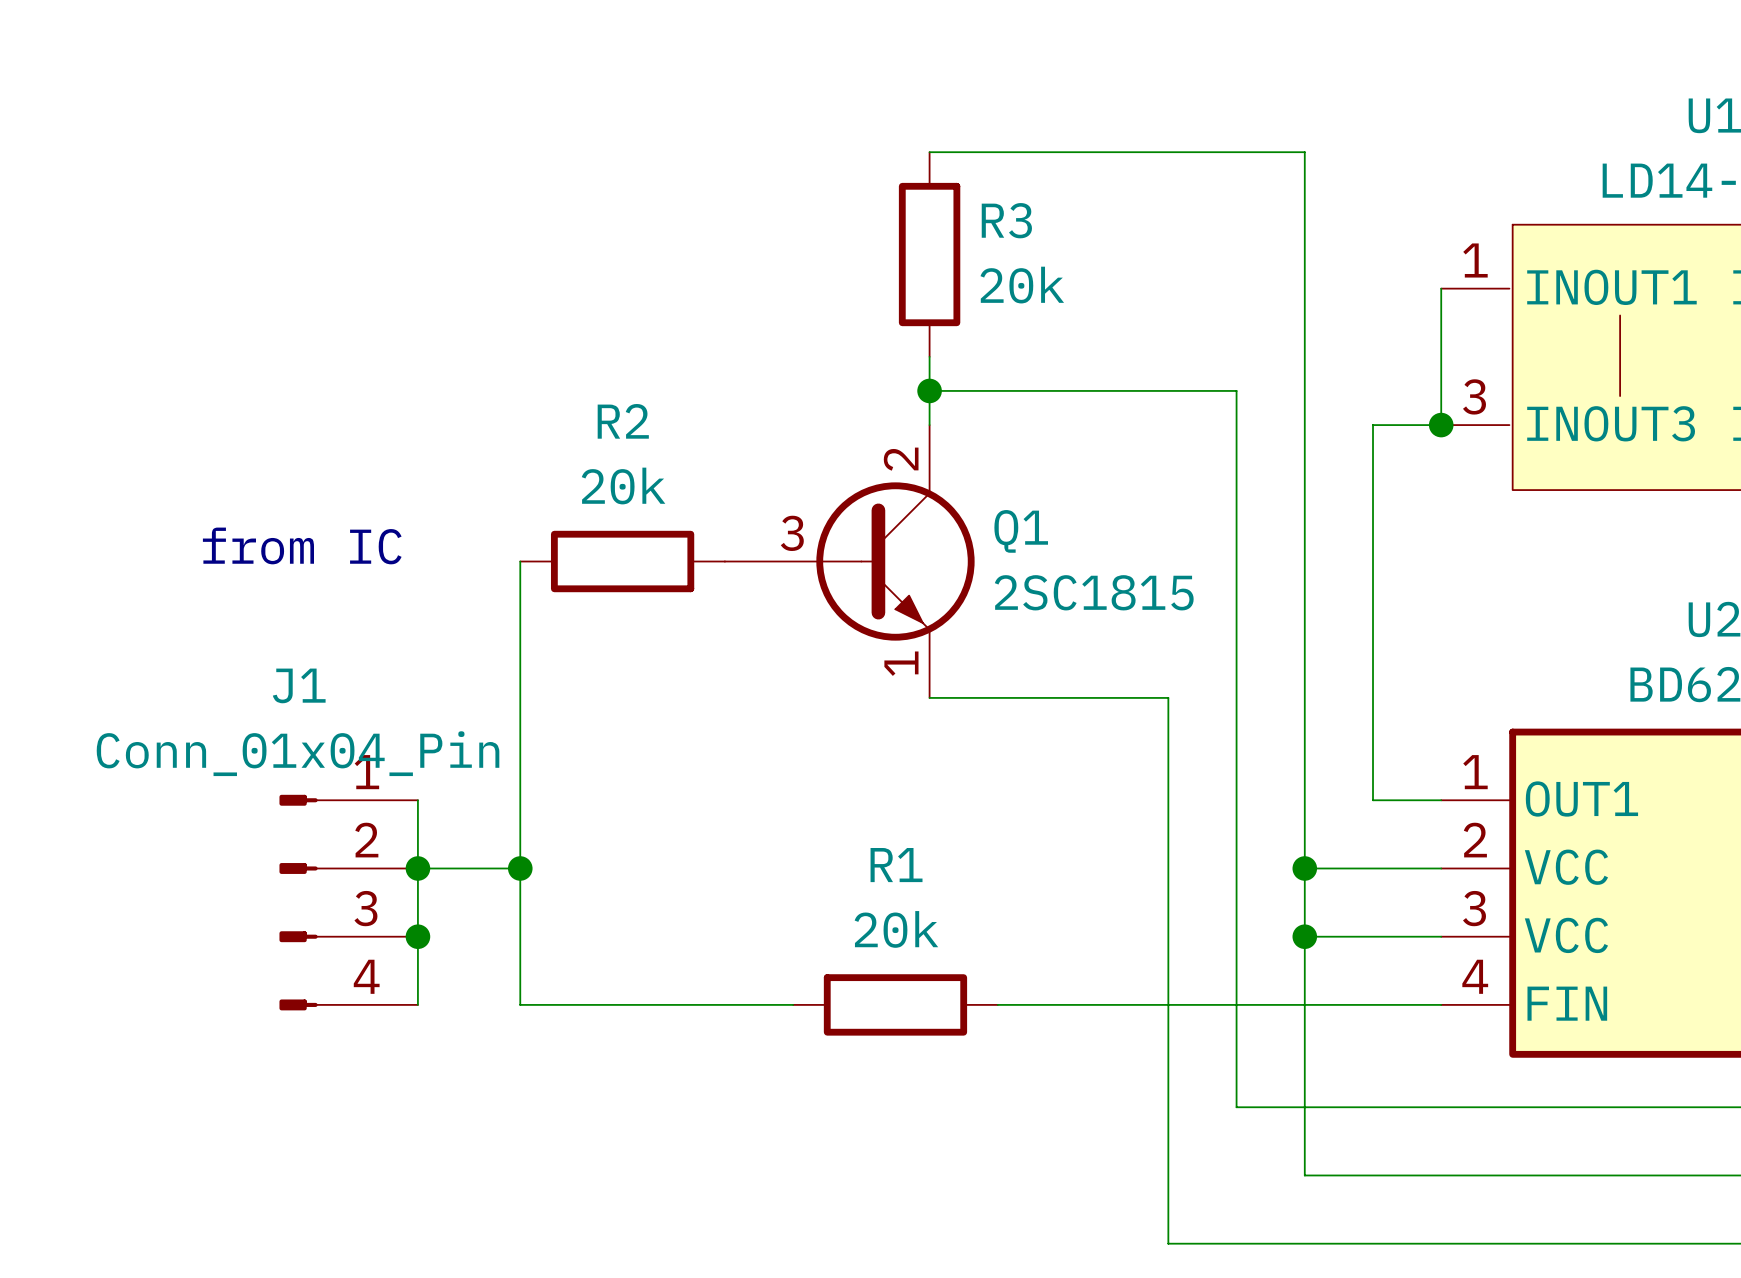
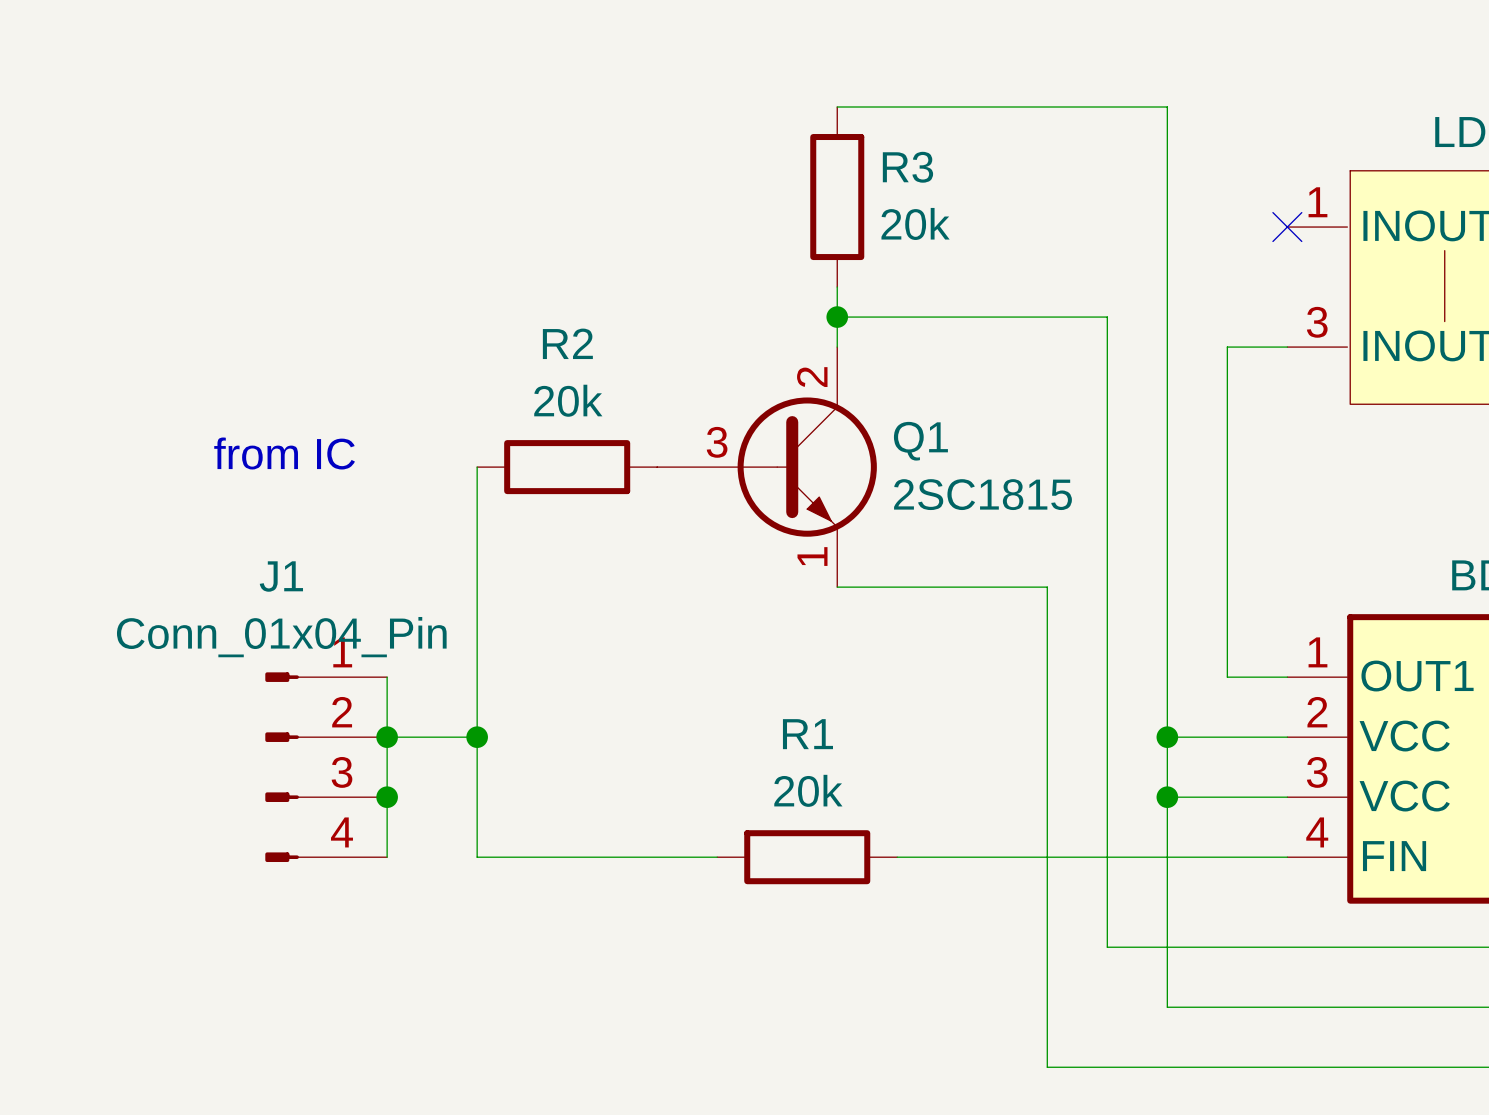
wire: (1441, 288) (1441, 425) -> none
no-connect mark: none -> (1287, 227)
junction: (1441, 425) -> none

